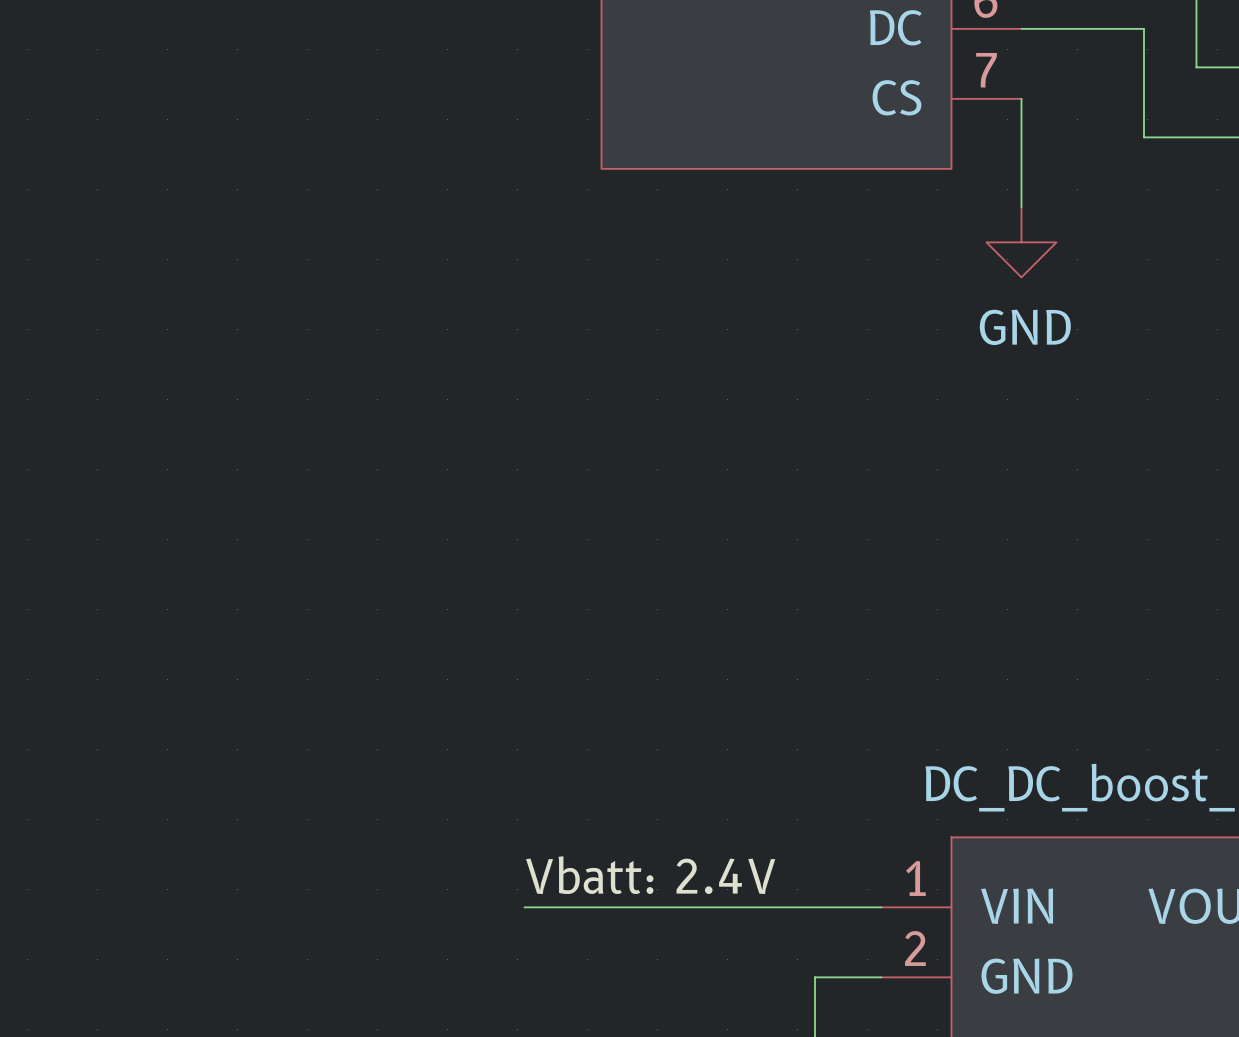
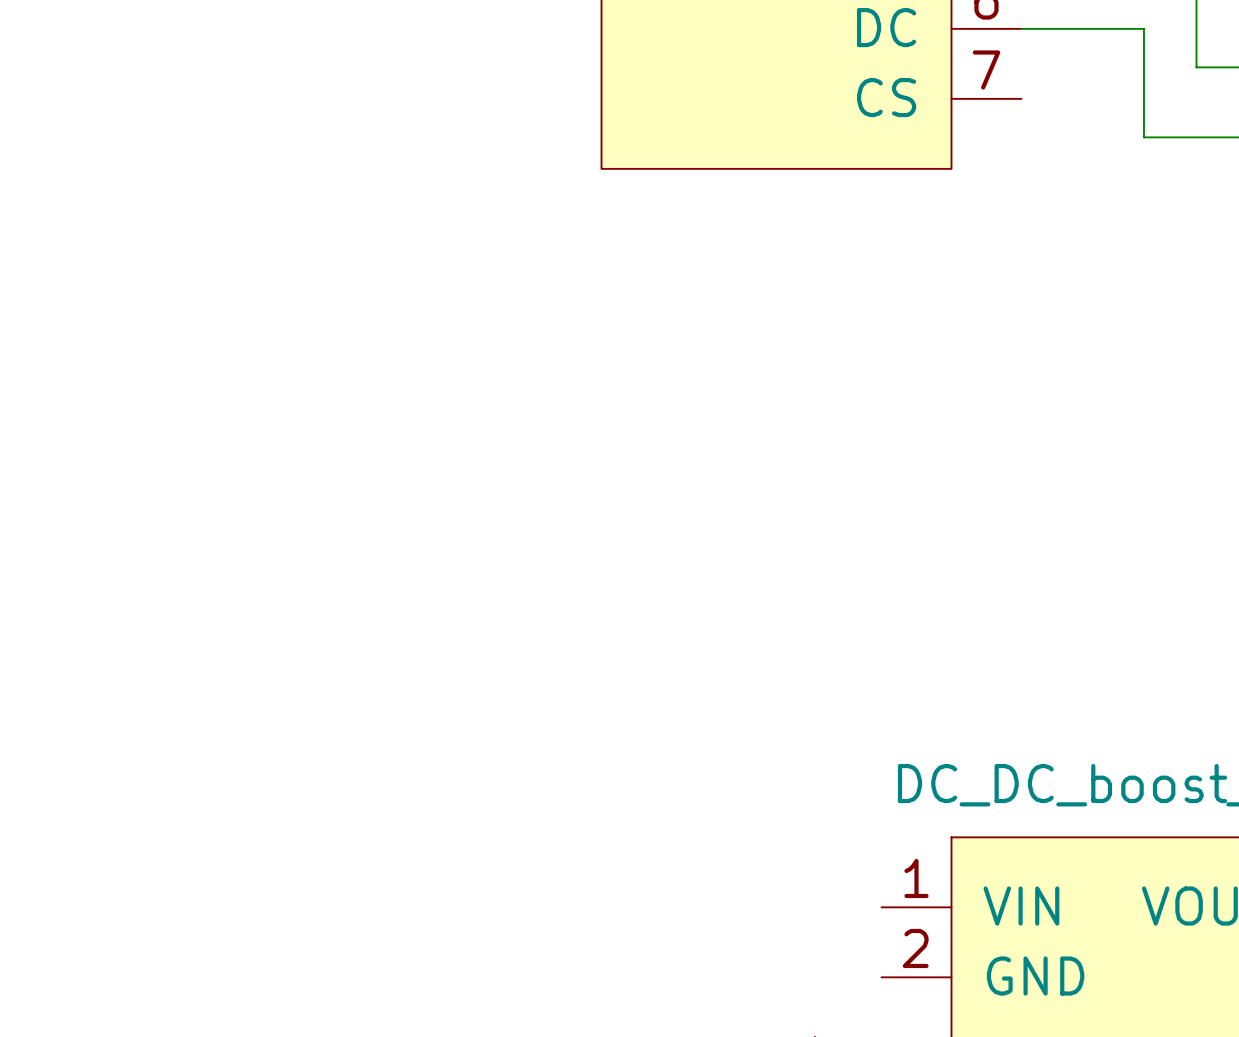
wire: (1021, 98) (1021, 207) -> none
power symbol: GND (1021, 242) -> none
label: Vbatt: 2.4V (650, 875) -> none
wire: (524, 907) (881, 907) -> none
wire: (881, 977) (814, 977) (814, 1036) -> none

